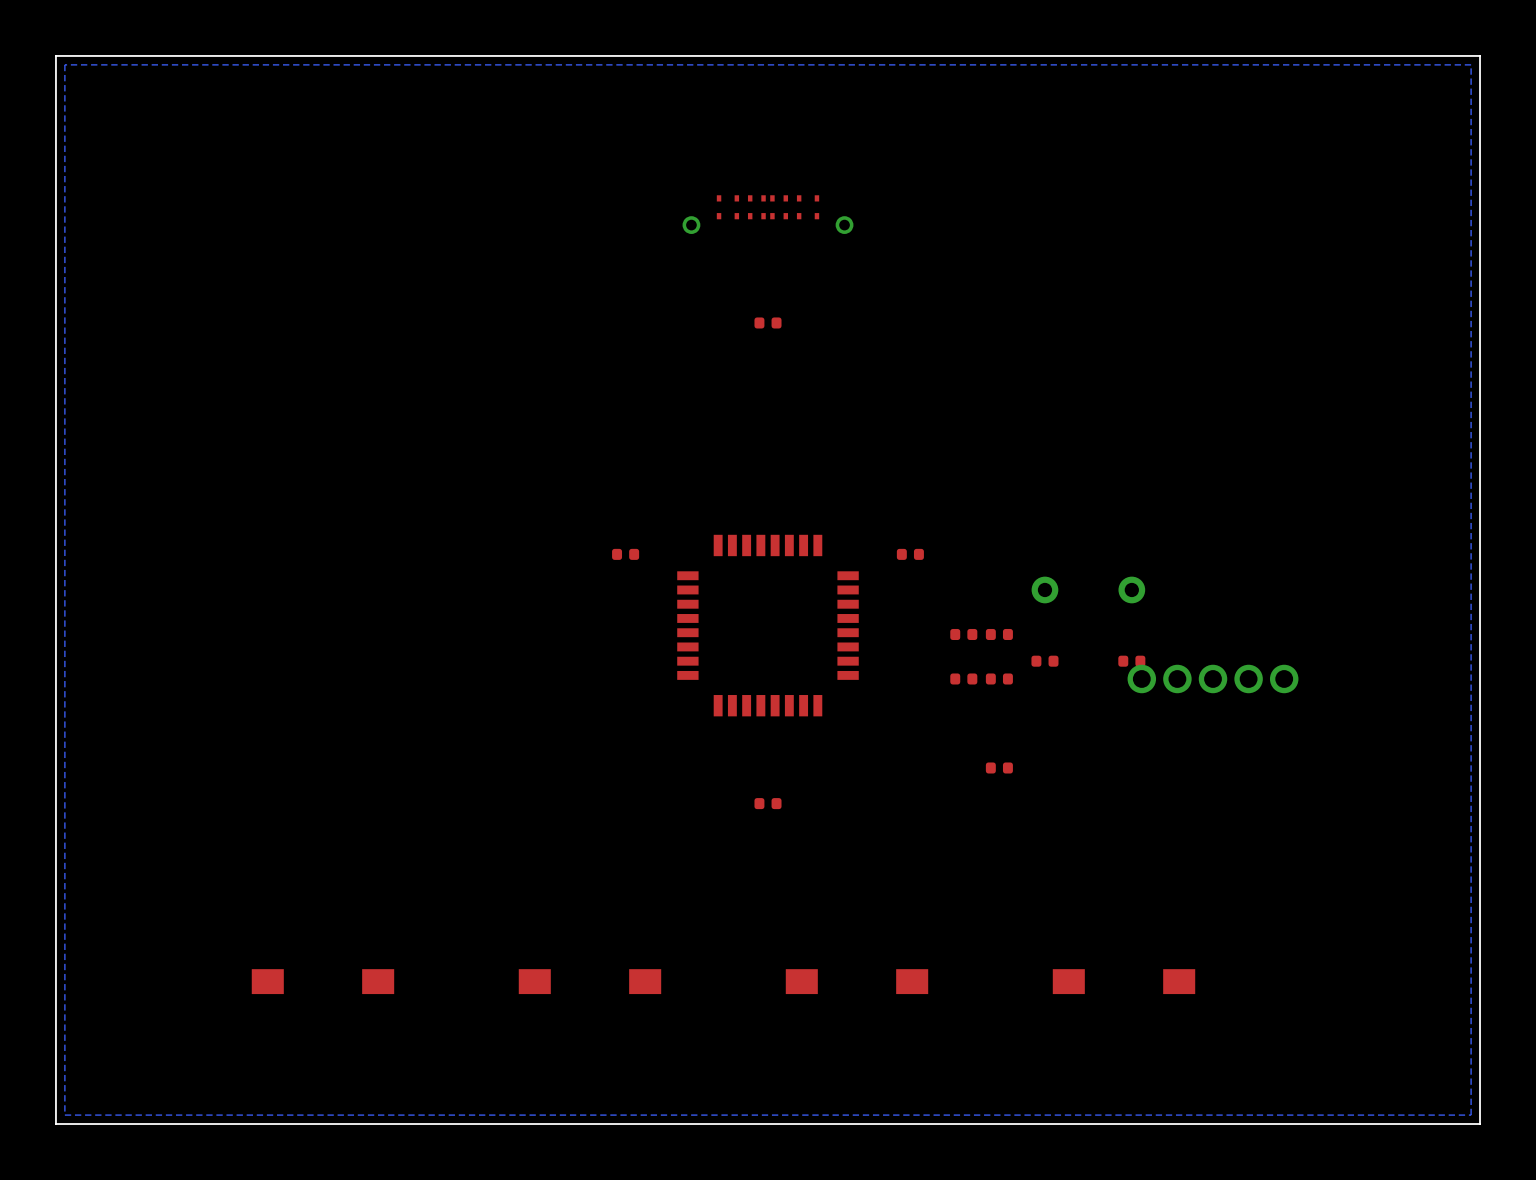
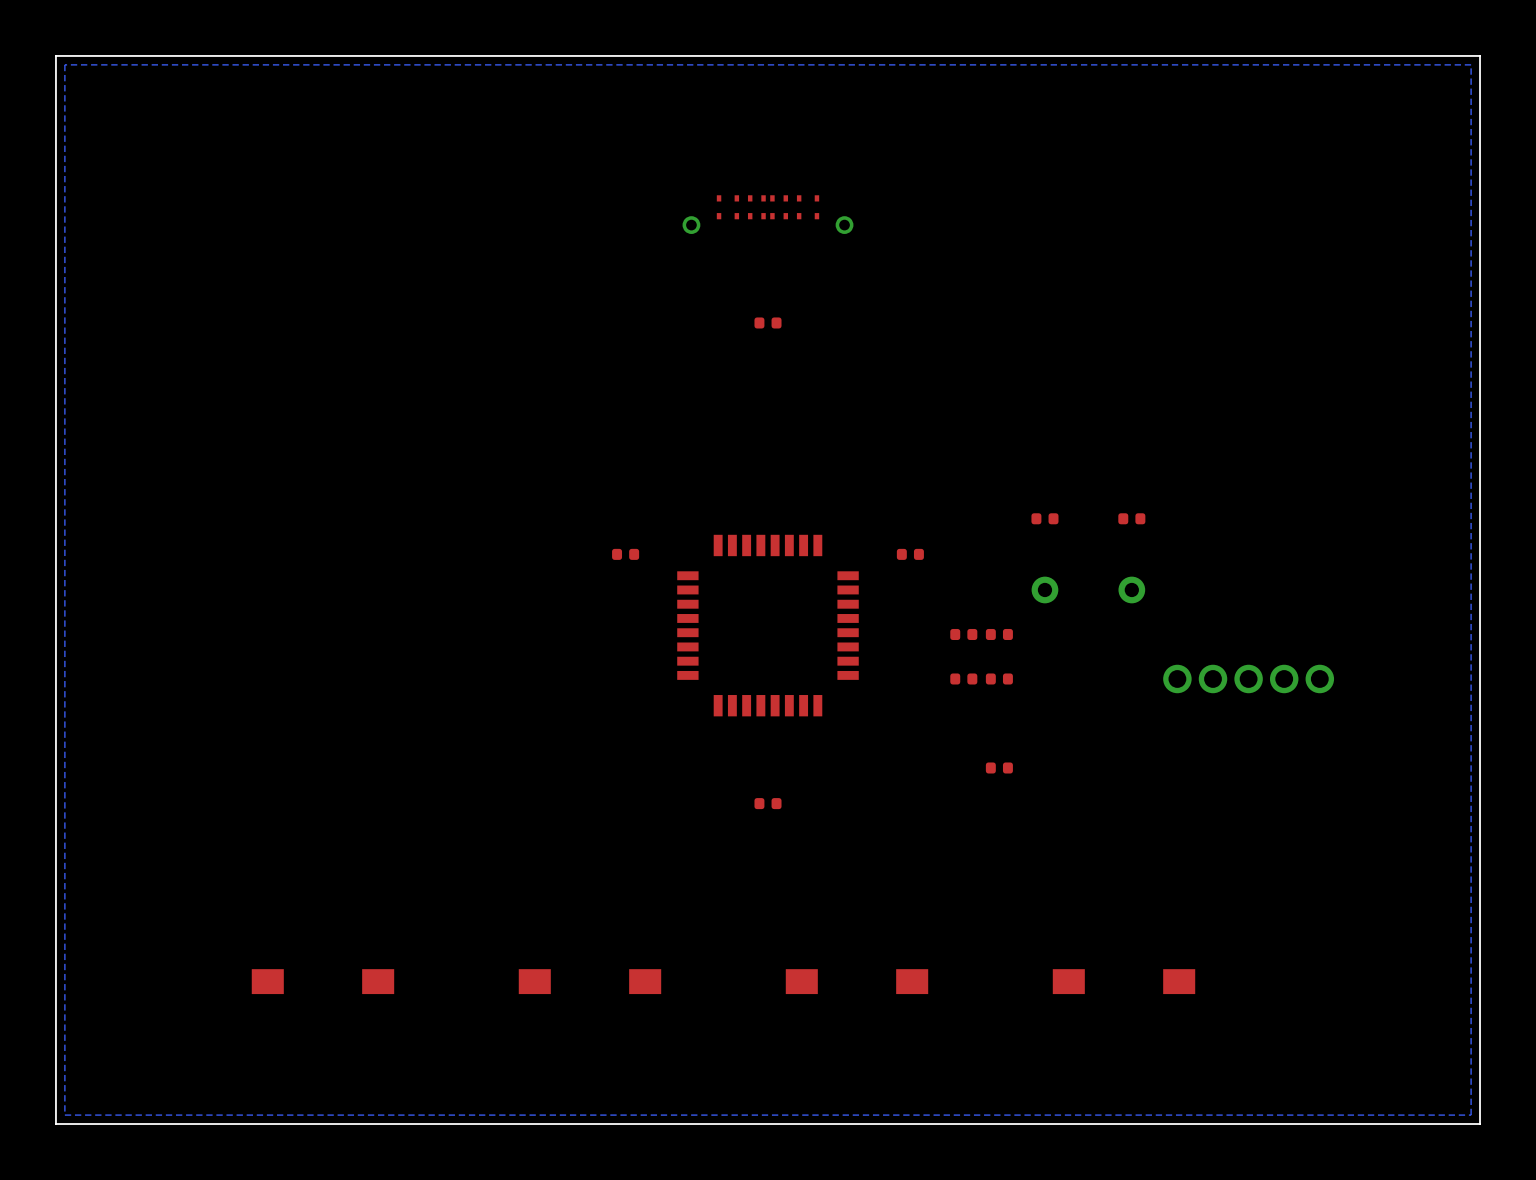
part: none -> (1044, 518)
part: none -> (1131, 518)
part: (1044, 661) -> none
part: (1131, 661) -> none
part position: (1213, 678) -> (1248, 678)

